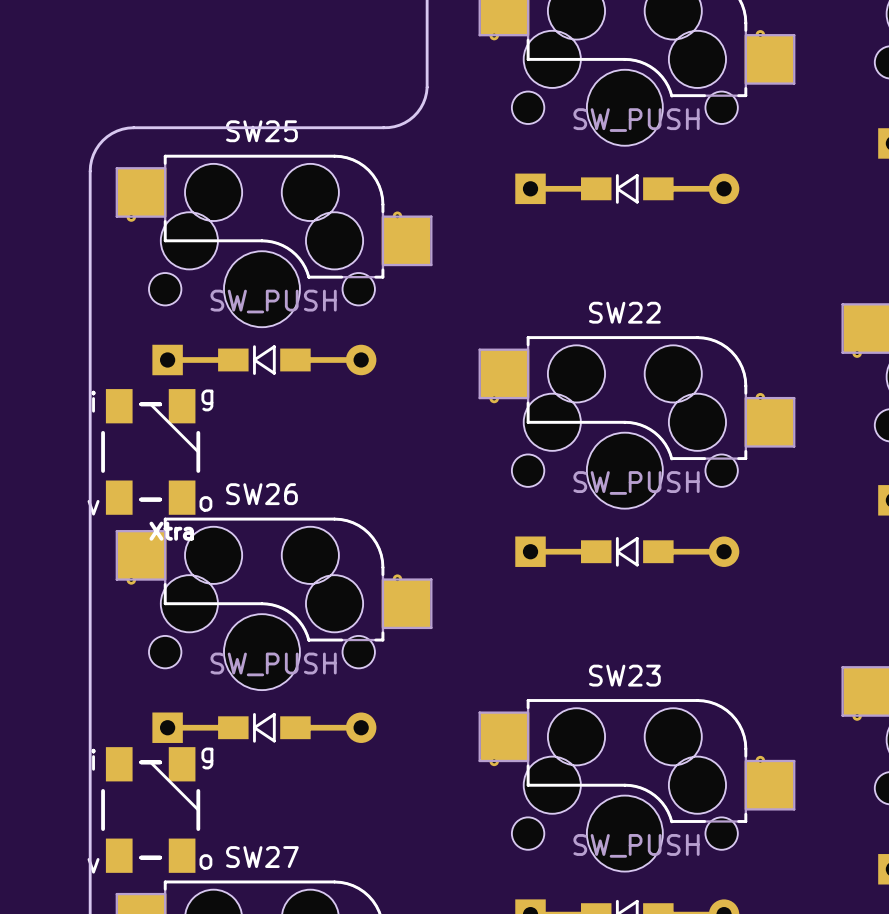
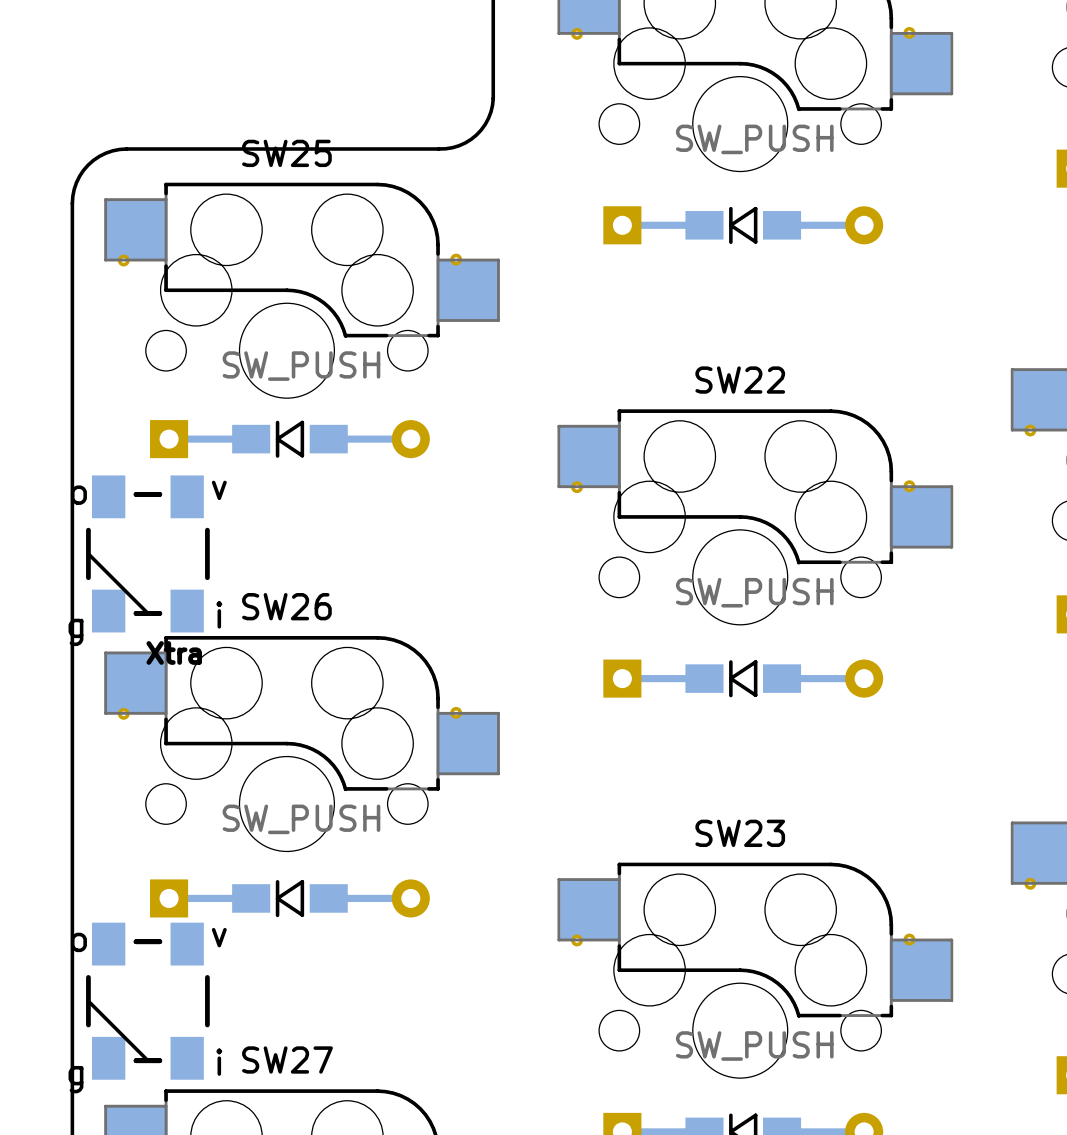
part rotation: 0° (150, 451) -> 180° (147, 553)
part rotation: 0° (150, 809) -> 180° (147, 1001)

